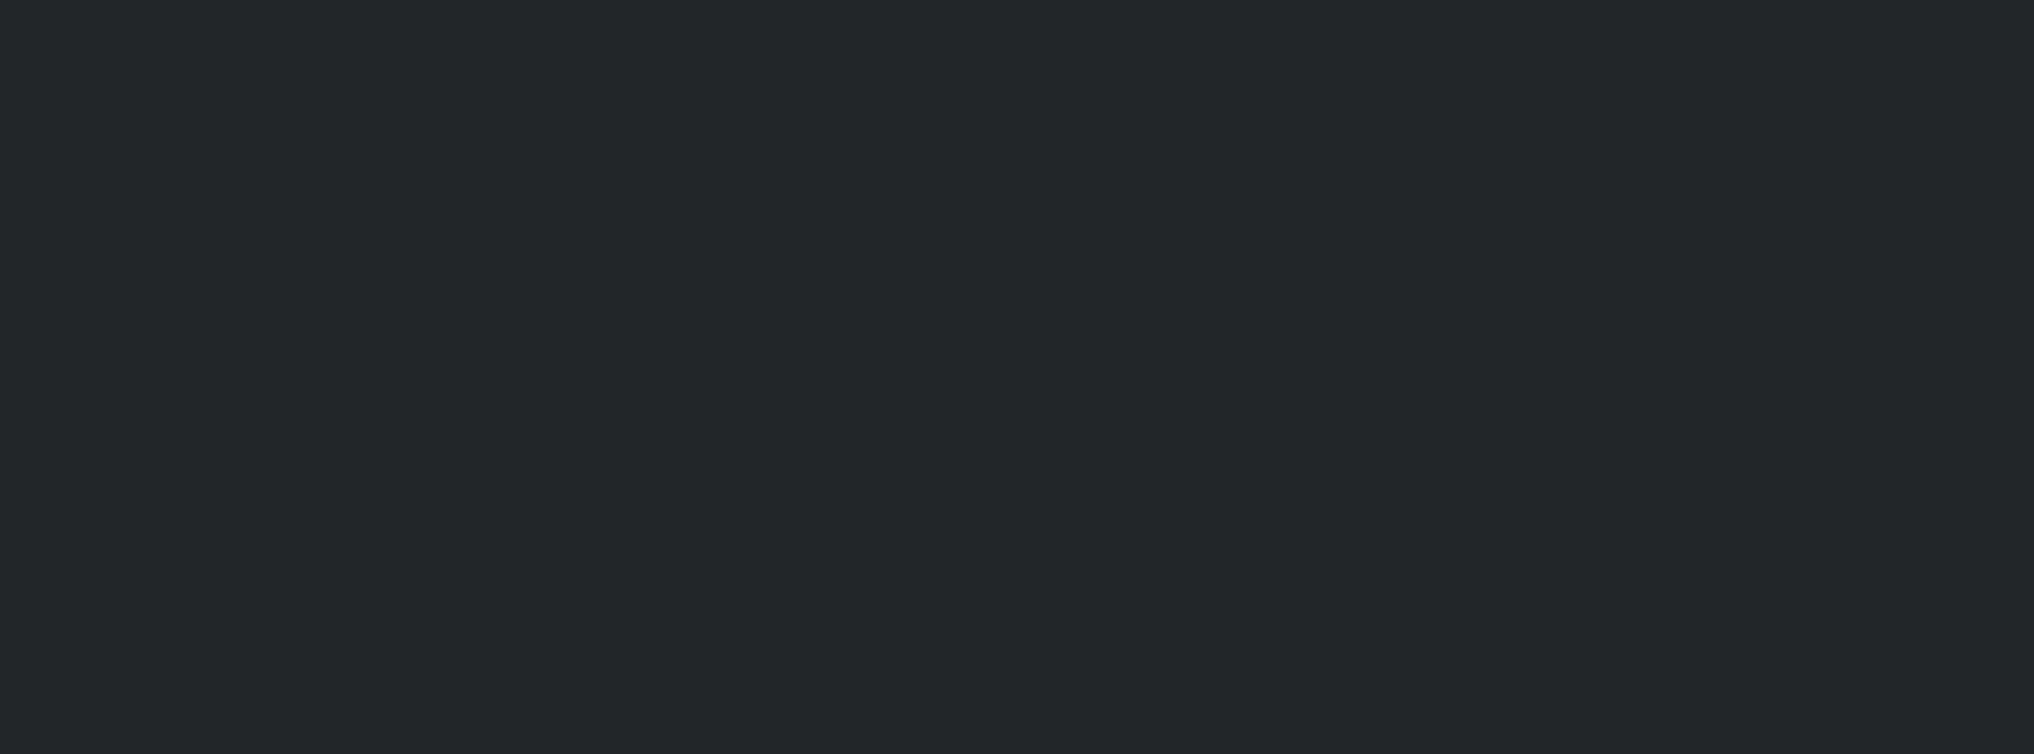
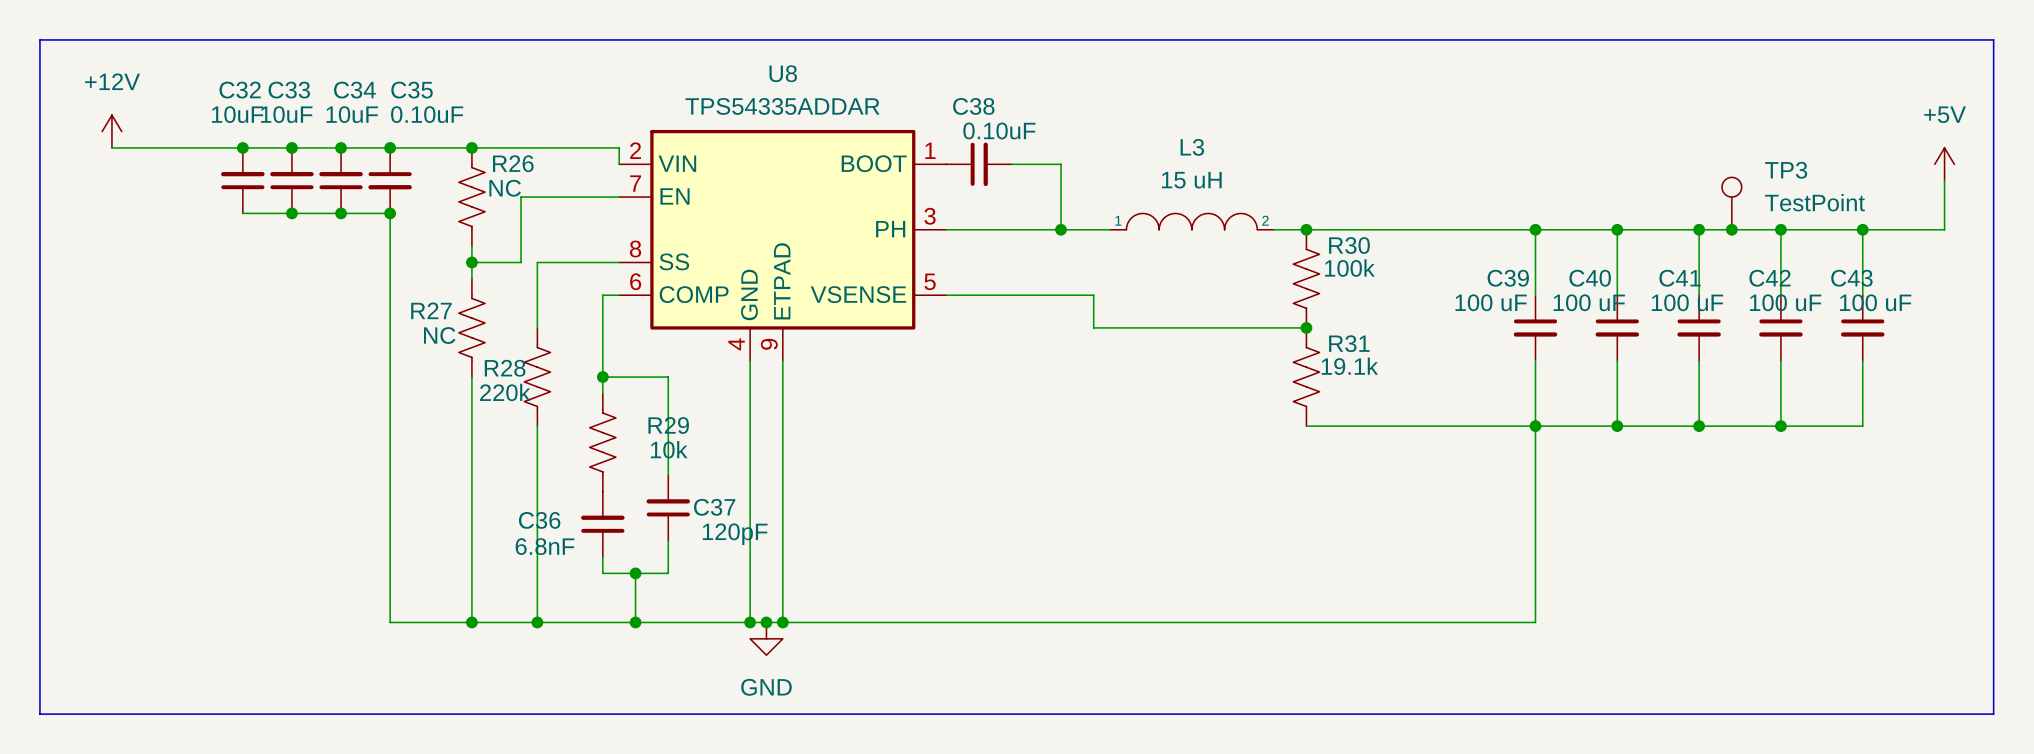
line: none -> (39, 39) (1993, 39) (1993, 714) (39, 714) (39, 39)
power symbol: none -> +12V (111, 131)
wire: none -> (111, 147) (619, 147) (619, 164)
junction: none -> (242, 147)
junction: none -> (291, 147)
junction: none -> (341, 147)
junction: none -> (390, 147)
junction: none -> (471, 147)
C38: none -> 0.10uF (979, 164)
wire: none -> (1011, 164) (1060, 164) (1060, 229)
power symbol: none -> +5V (1944, 164)
C32: none -> 10uF (242, 180)
C33: none -> 10uF (291, 180)
C34: none -> 10uF (341, 180)
C35: none -> 0.10uF (390, 180)
wire: none -> (1944, 180) (1944, 229) (1273, 229)
R26: none -> NC (471, 197)
wire: none -> (619, 197) (521, 197) (521, 262) (471, 262)
TP3: none -> TestPoint (1731, 203)
wire: none -> (242, 213) (390, 213) (390, 622) (1535, 622) (1535, 360)
junction: none -> (291, 213)
junction: none -> (341, 213)
junction: none -> (390, 213)
L3: none -> 15 uH (1191, 221)
wire: none -> (946, 229) (1110, 229)
junction: none -> (1060, 229)
junction: none -> (1306, 229)
wire: none -> (1535, 229) (1535, 295)
junction: none -> (1535, 229)
wire: none -> (1617, 229) (1617, 295)
junction: none -> (1617, 229)
wire: none -> (1699, 229) (1699, 295)
junction: none -> (1699, 229)
junction: none -> (1731, 229)
wire: none -> (1780, 229) (1780, 295)
junction: none -> (1780, 229)
wire: none -> (1862, 229) (1862, 295)
junction: none -> (1862, 229)
U8: none -> TPS54335ADDAR (782, 245)
wire: none -> (471, 246) (471, 278)
junction: none -> (471, 262)
wire: none -> (619, 262) (537, 262) (537, 327)
R30: none -> 100k (1306, 278)
wire: none -> (619, 295) (602, 295) (602, 393)
wire: none -> (946, 295) (1093, 295) (1093, 327) (1306, 327)
R27: none -> NC (471, 327)
junction: none -> (1306, 327)
C39: none -> 100 uF (1535, 327)
C40: none -> 100 uF (1617, 327)
C41: none -> 100 uF (1699, 327)
C42: none -> 100 uF (1780, 327)
C43: none -> 100 uF (1862, 327)
wire: none -> (750, 360) (750, 622)
wire: none -> (782, 360) (782, 622)
wire: none -> (1617, 360) (1617, 426)
wire: none -> (1699, 360) (1699, 426)
wire: none -> (1780, 360) (1780, 426)
wire: none -> (1862, 360) (1862, 426) (1306, 426)
wire: none -> (471, 377) (471, 622)
R28: none -> 220k (537, 377)
wire: none -> (602, 377) (668, 377) (668, 475)
junction: none -> (602, 377)
R31: none -> 19.1k (1306, 377)
wire: none -> (537, 426) (537, 622)
junction: none -> (1535, 426)
junction: none -> (1617, 426)
junction: none -> (1699, 426)
junction: none -> (1780, 426)
R29: none -> 10k (602, 442)
C37: none -> 120pF (668, 507)
C36: none -> 6.8nF (602, 524)
wire: none -> (668, 540) (668, 573) (602, 573) (602, 557)
wire: none -> (635, 573) (635, 622)
junction: none -> (635, 573)
junction: none -> (471, 622)
junction: none -> (537, 622)
junction: none -> (635, 622)
junction: none -> (750, 622)
junction: none -> (766, 622)
junction: none -> (782, 622)
power symbol: none -> GND (766, 638)

